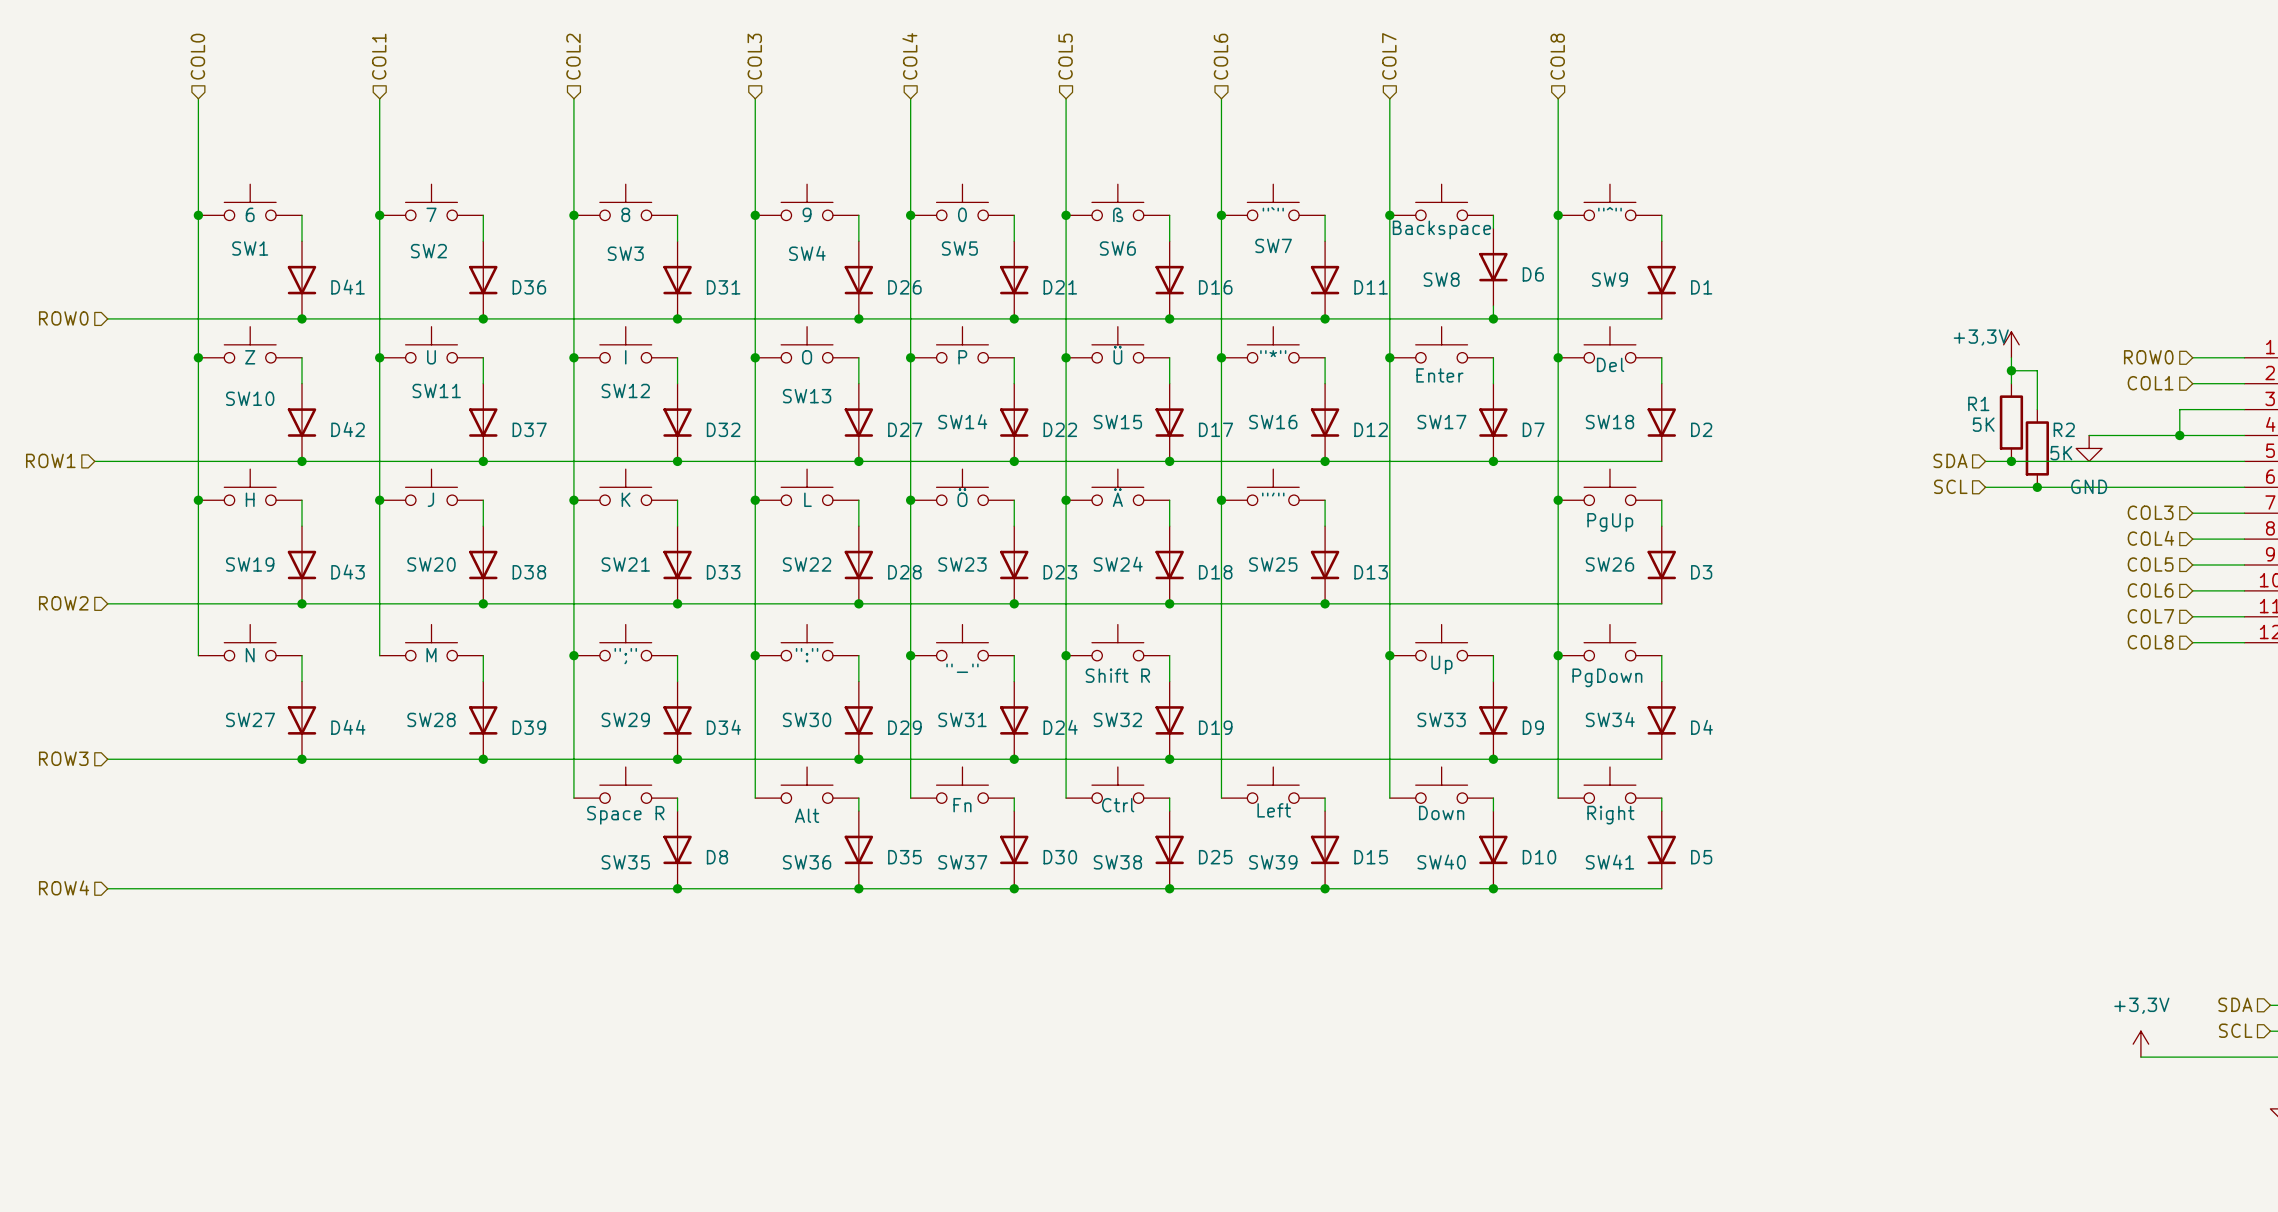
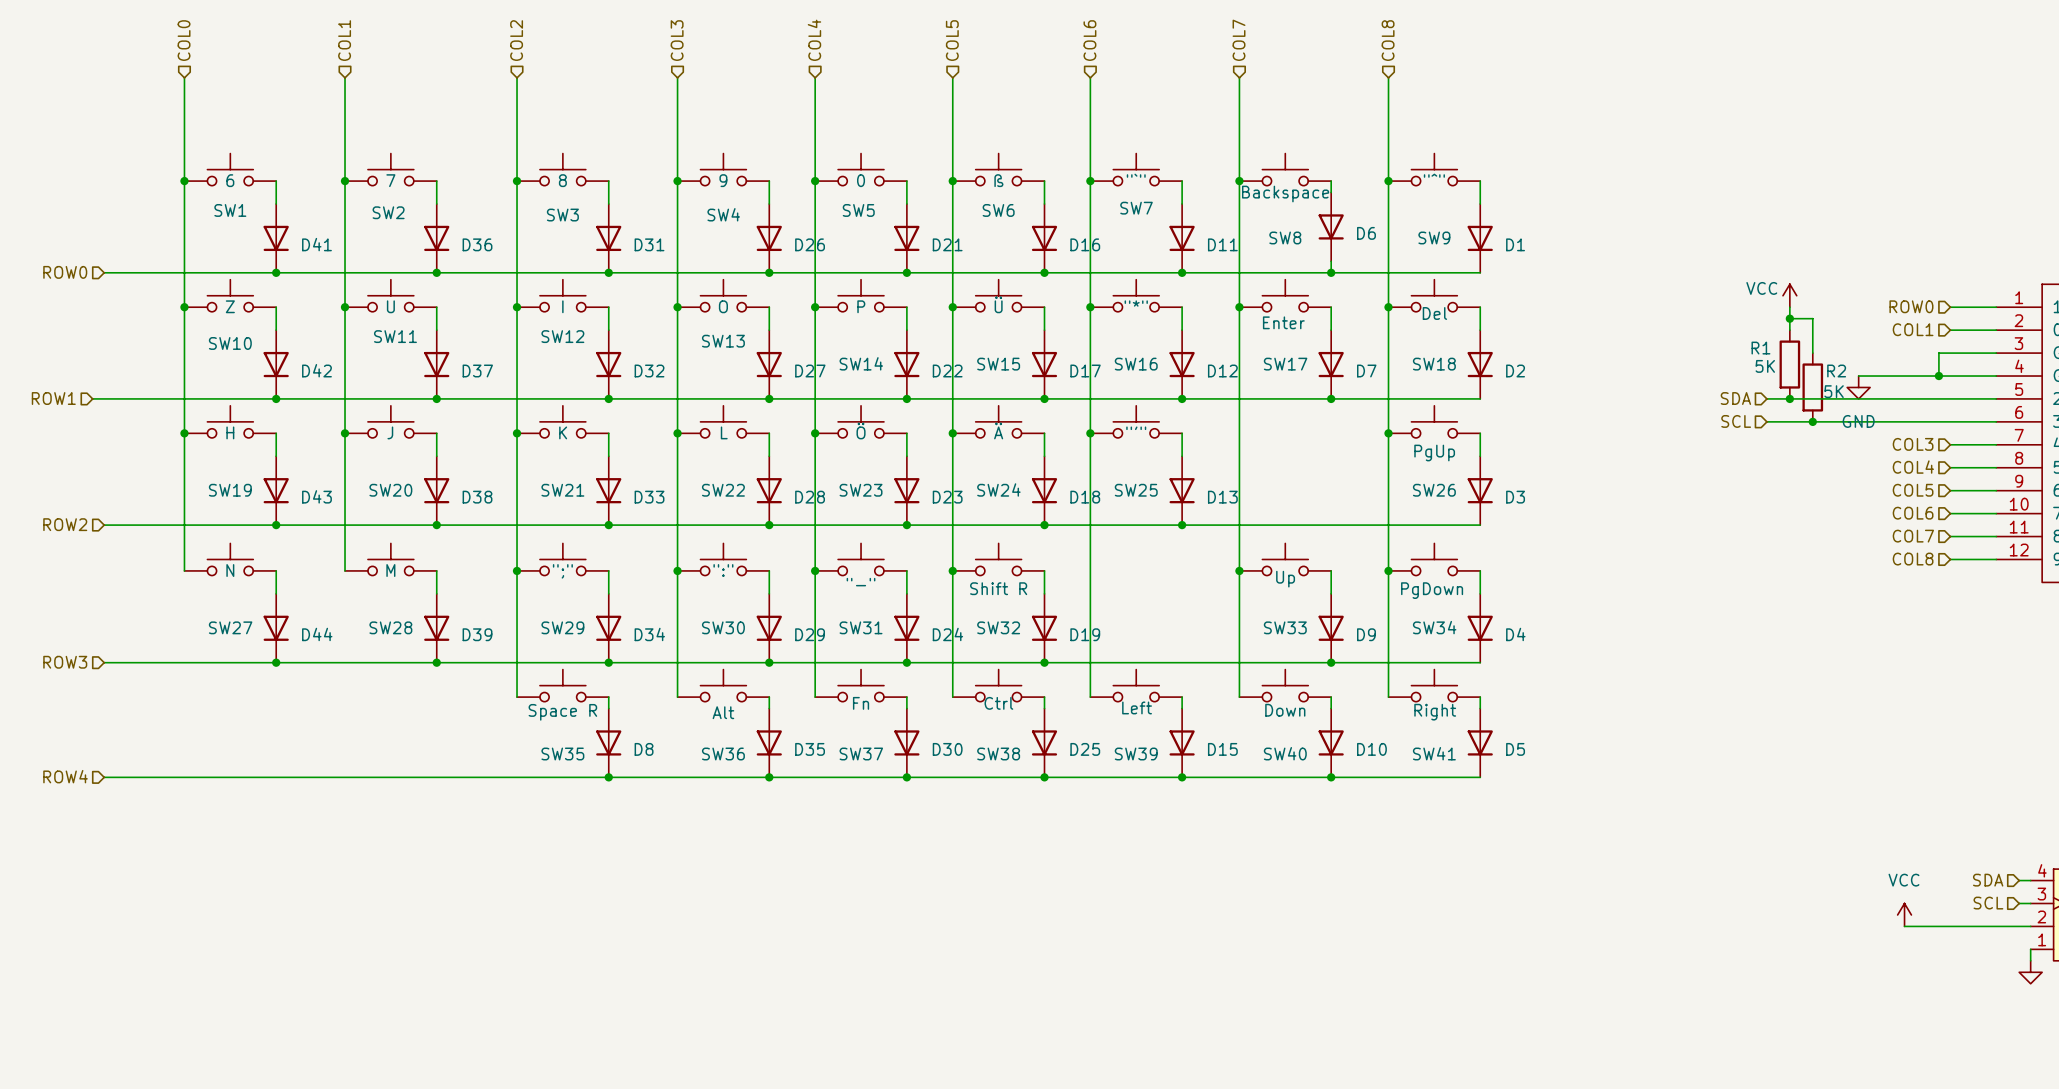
power symbol: +3,3V (2011, 344) -> VCC (1789, 295)
power symbol: +3,3V (2140, 1044) -> VCC (1904, 914)

